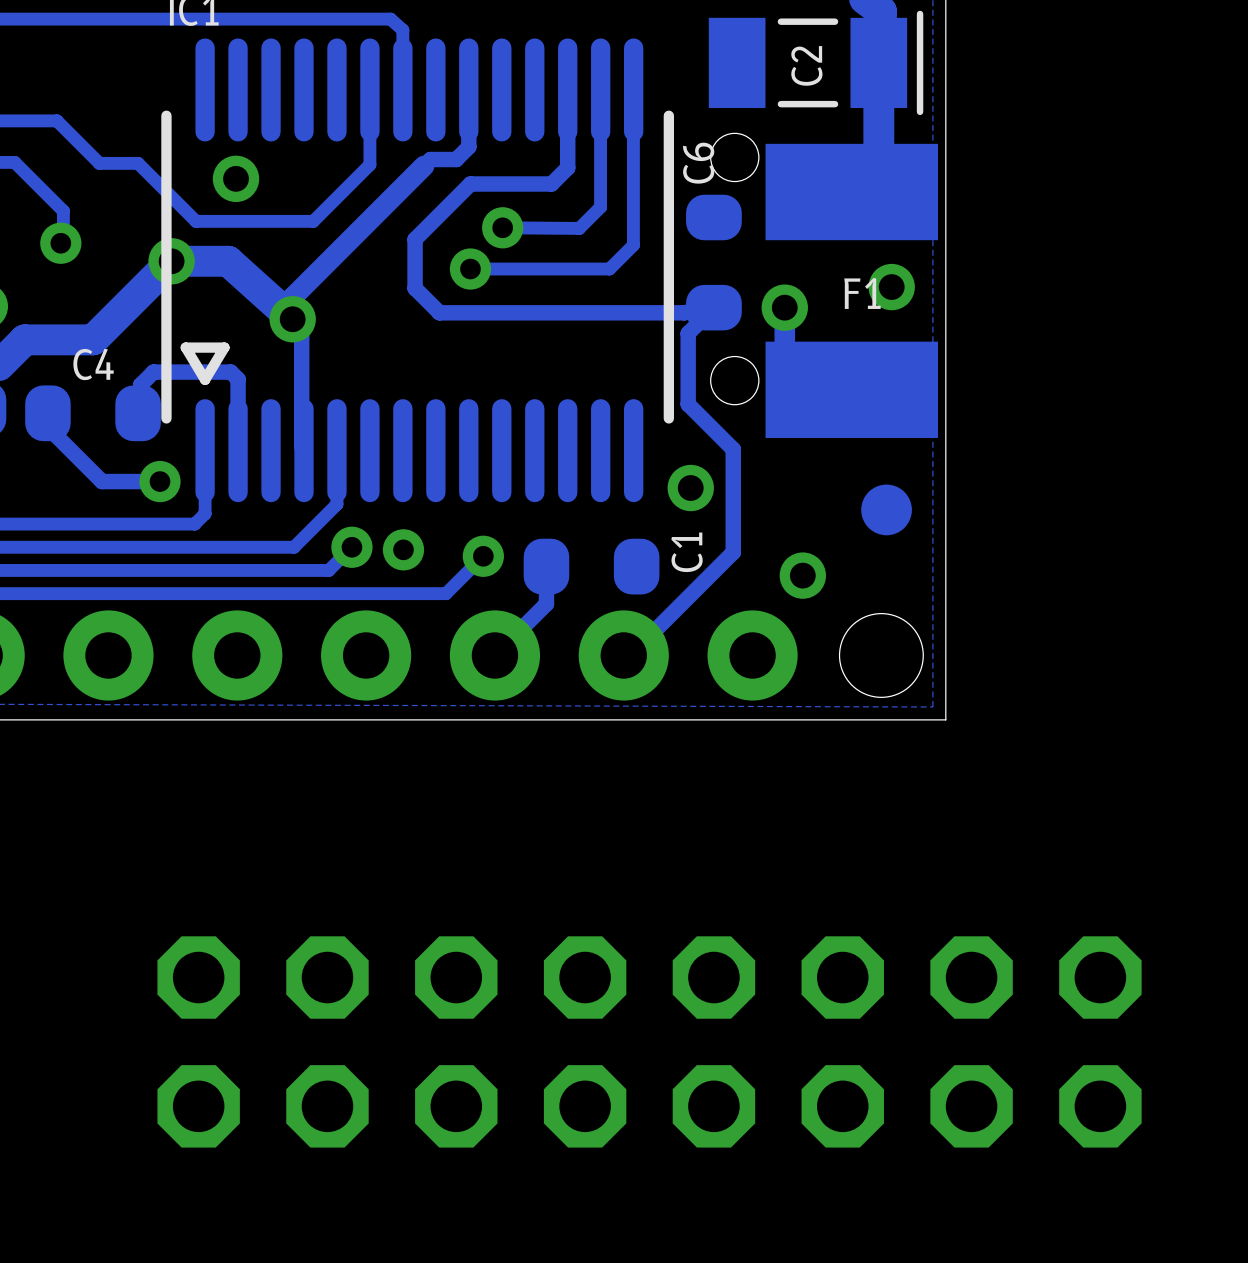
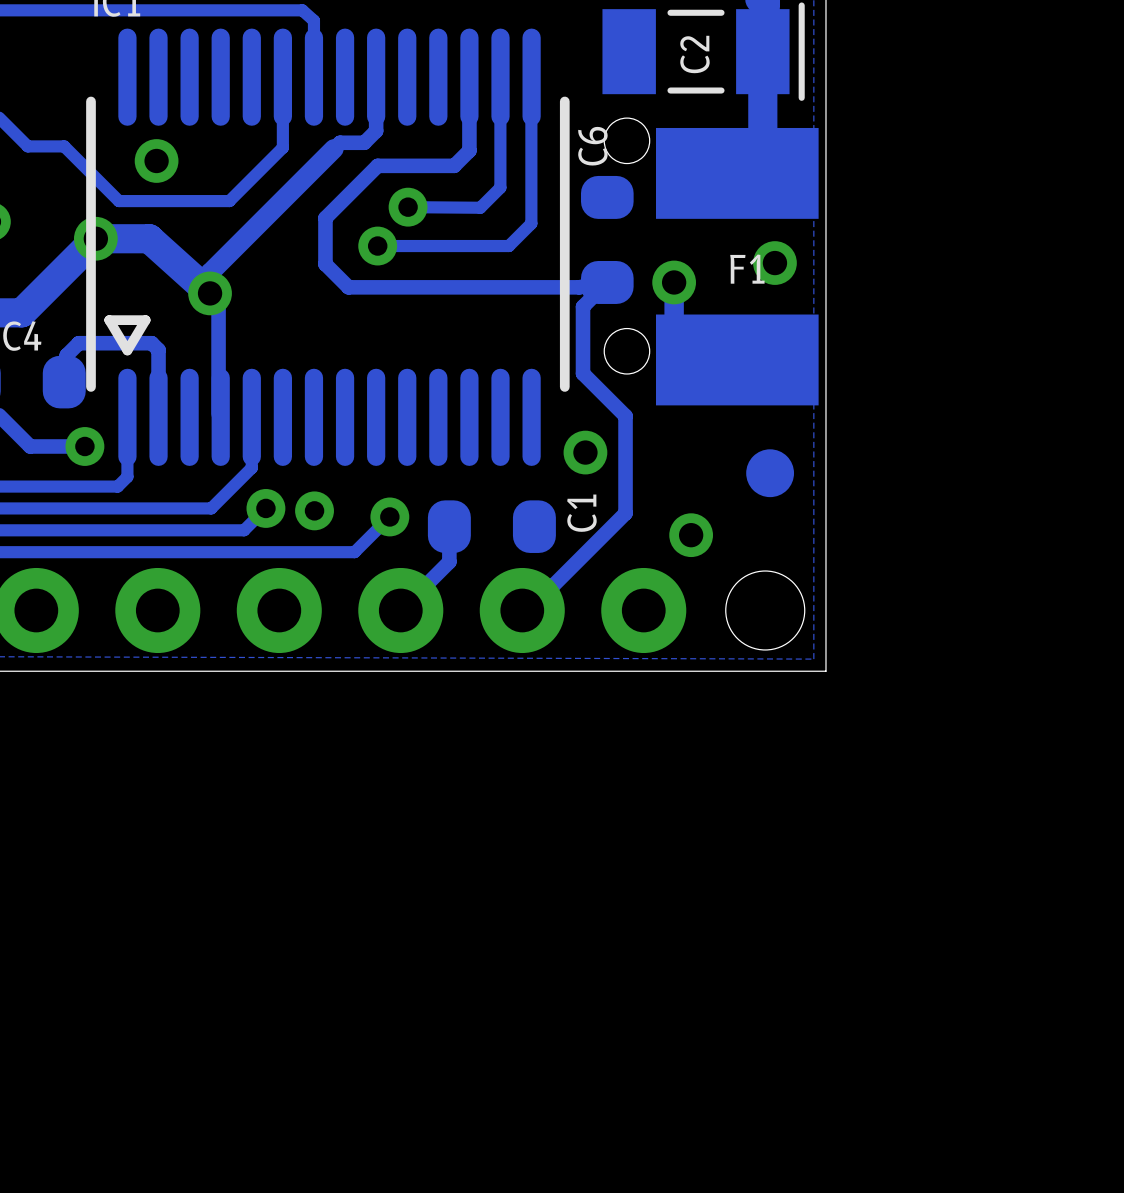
part: (649, 1041) -> none

